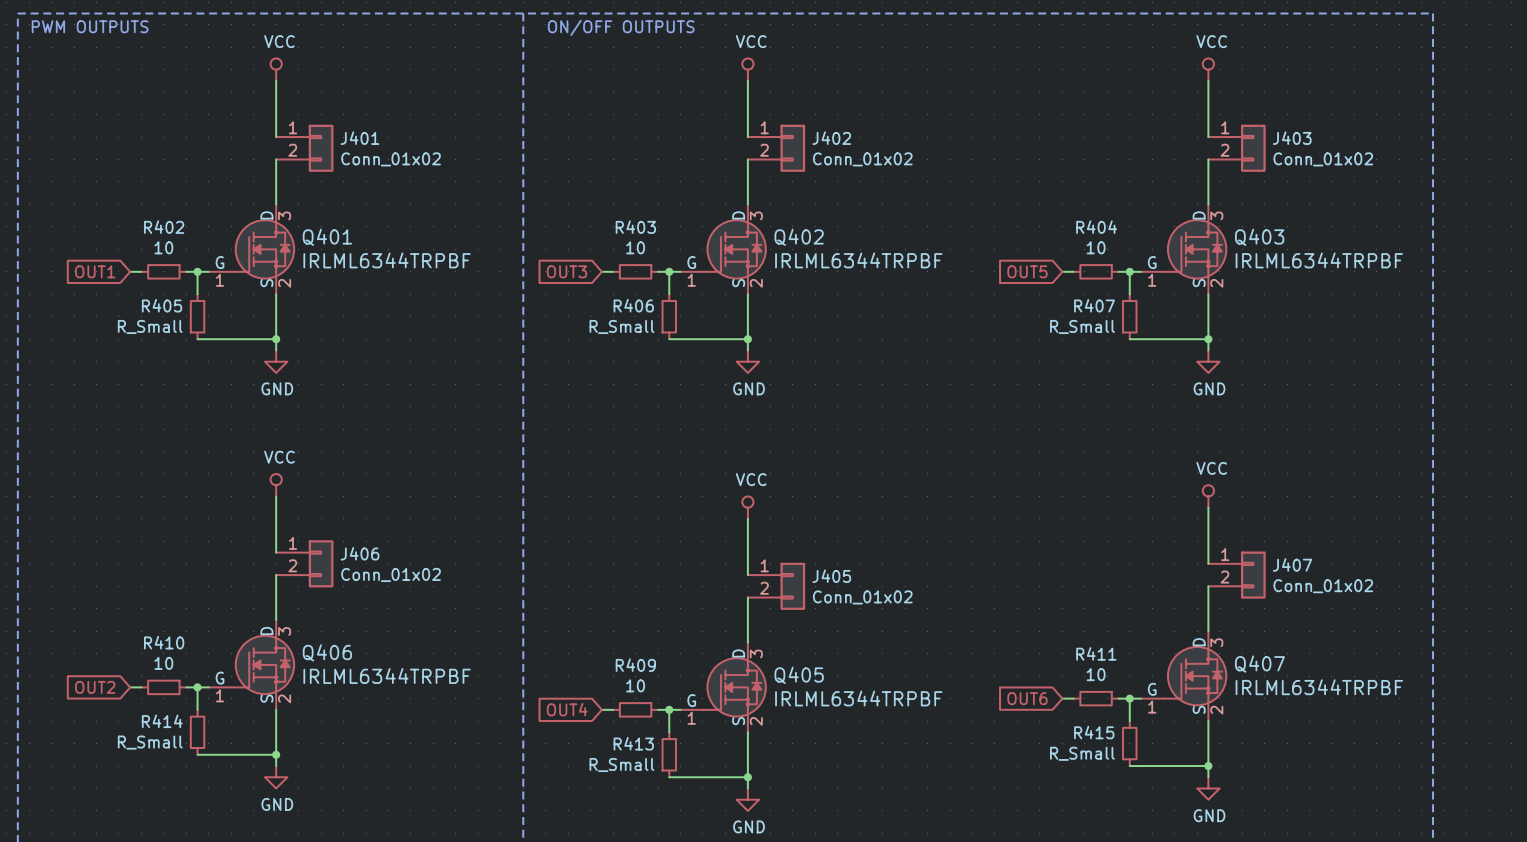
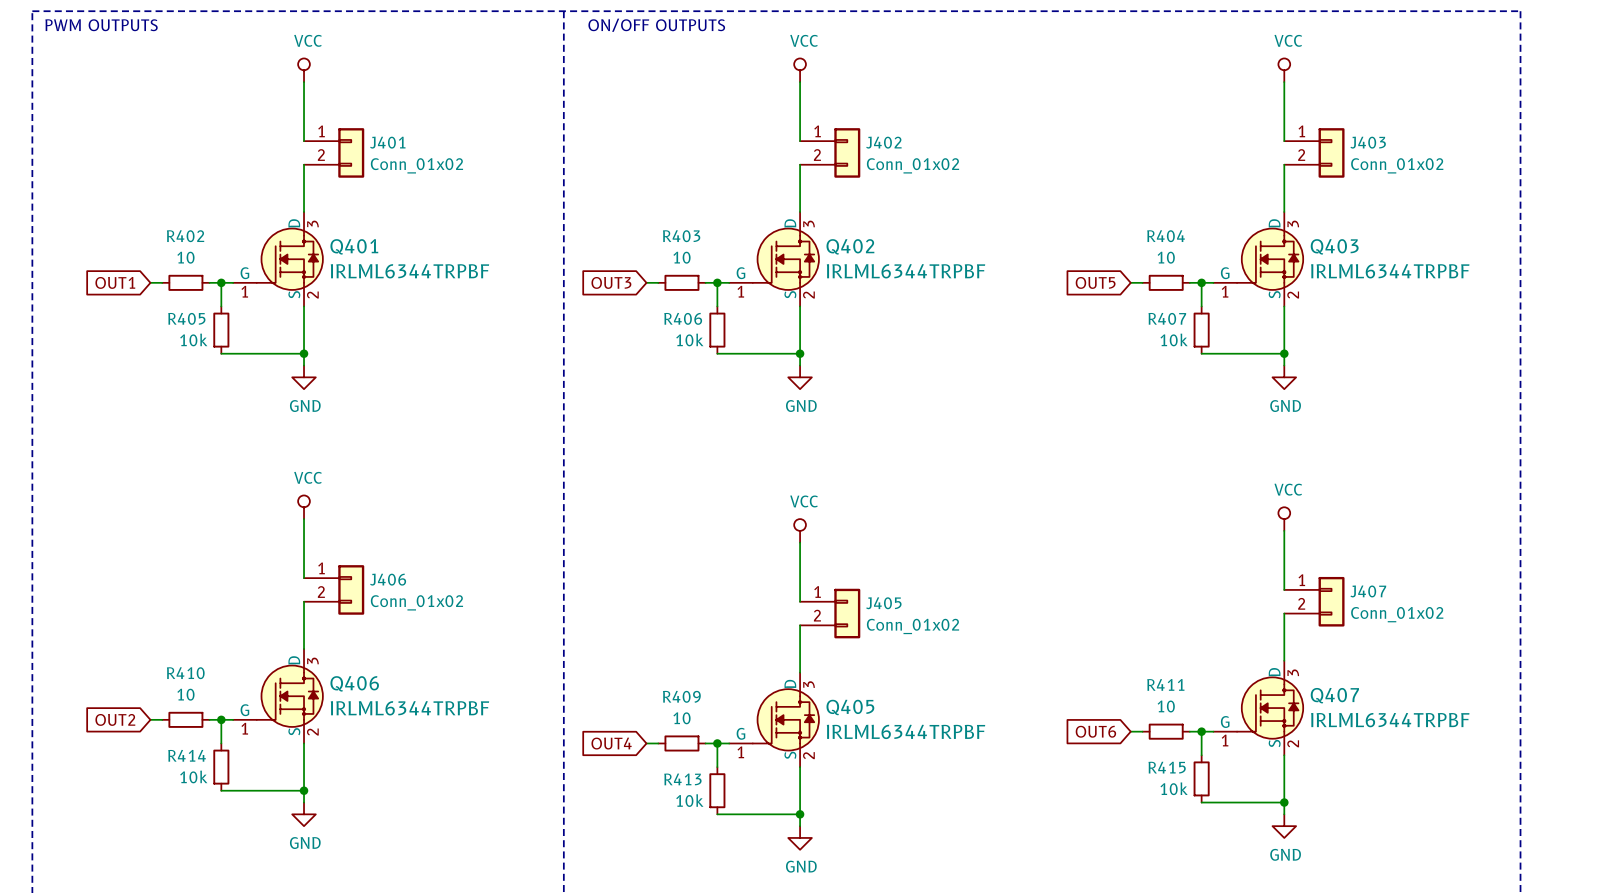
R405 value: R_Small (150, 326) -> 10k (193, 339)
R406 value: R_Small (621, 326) -> 10k (689, 339)
R407 value: R_Small (1082, 326) -> 10k (1174, 339)
R414 value: R_Small (150, 742) -> 10k (193, 776)
R415 value: R_Small (1082, 753) -> 10k (1174, 788)
R413 value: R_Small (621, 765) -> 10k (689, 800)

